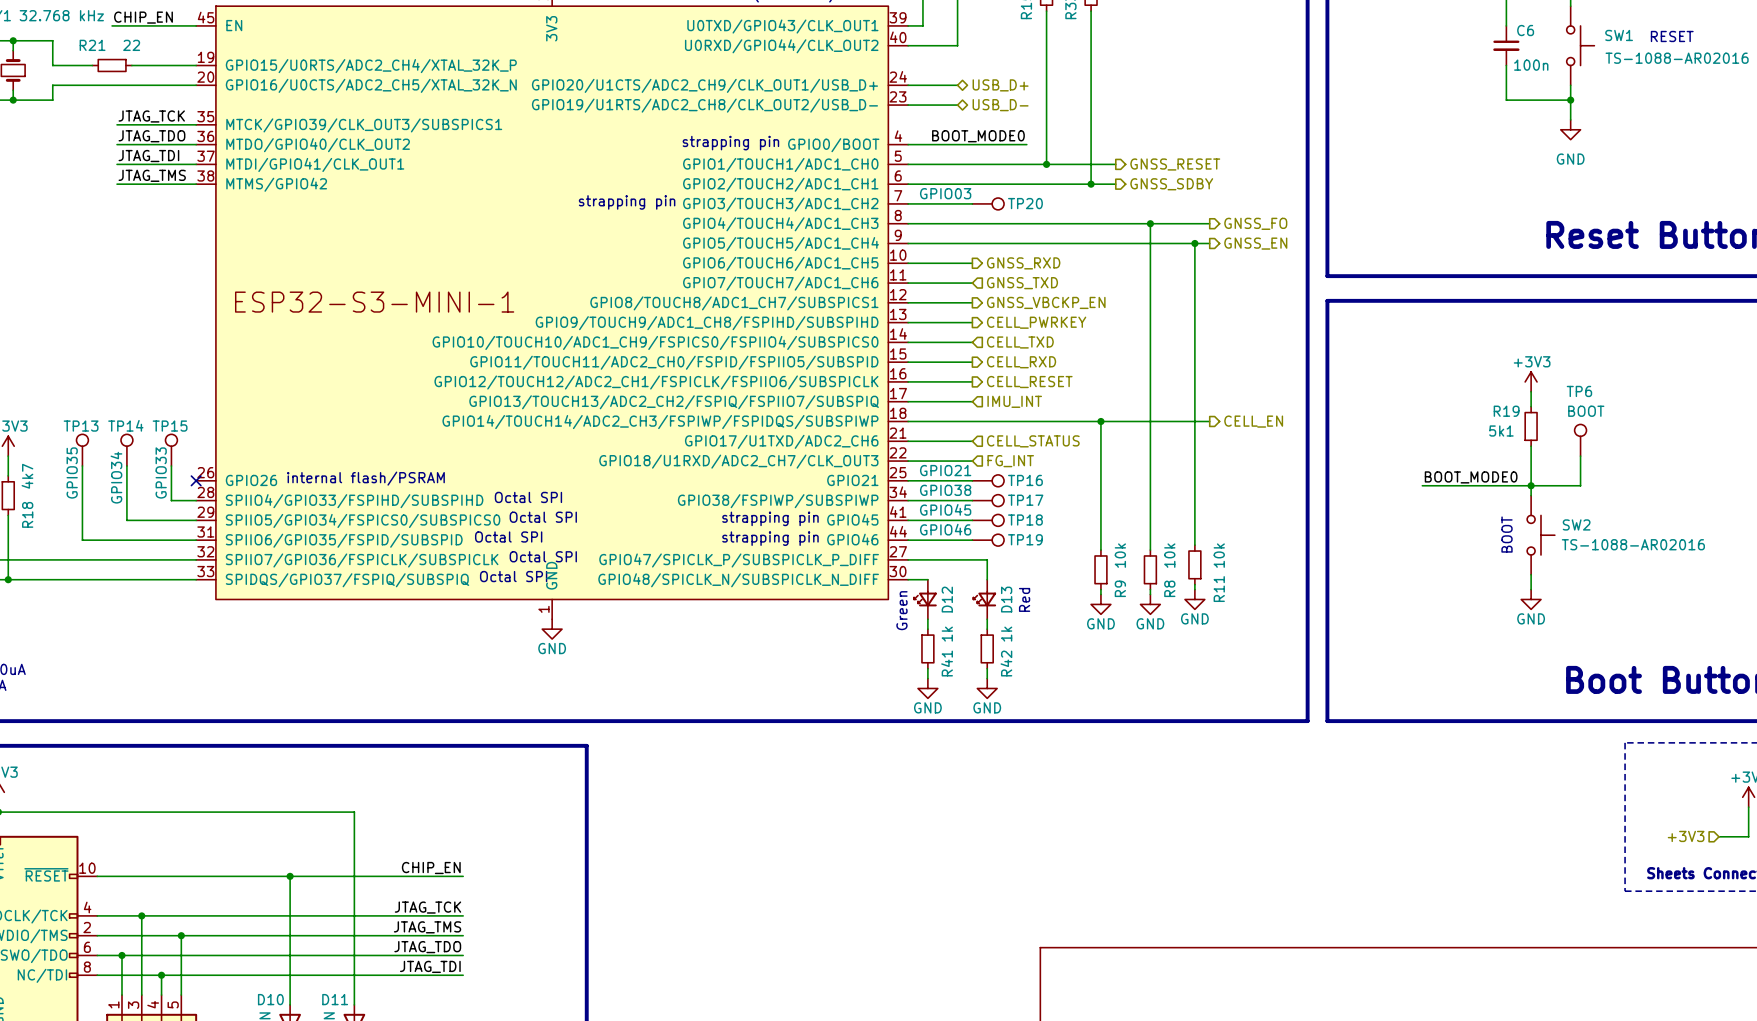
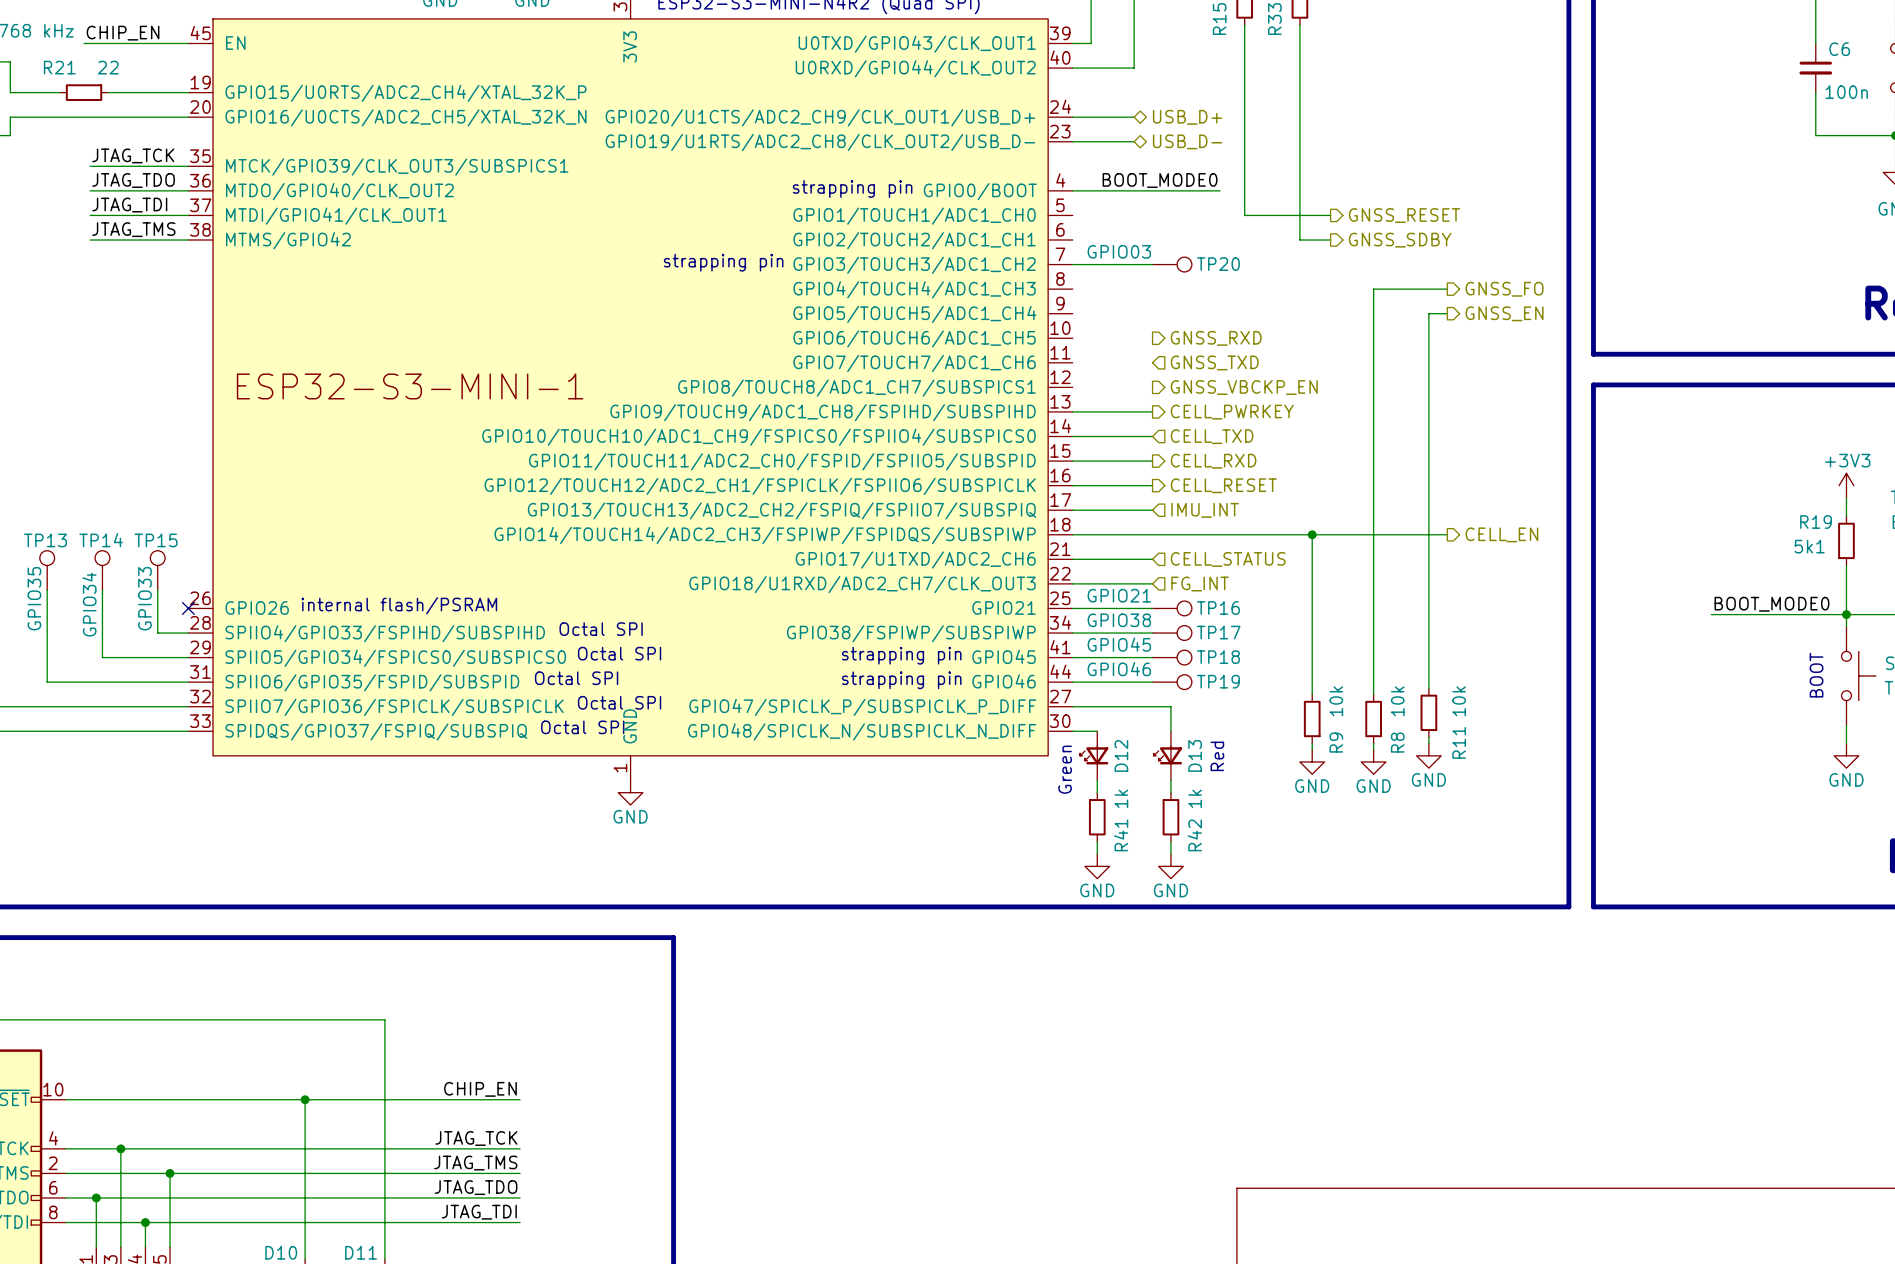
wire: (908, 164) (1046, 164) -> none
junction: (1046, 164) -> none
wire: (908, 184) (1091, 184) -> none
junction: (1091, 184) -> none
wire: (908, 223) (1150, 223) -> none
junction: (1150, 223) -> none
wire: (908, 243) (1194, 243) -> none
junction: (1194, 243) -> none
wire: (908, 263) (972, 263) -> none
wire: (908, 283) (972, 283) -> none
wire: (908, 302) (972, 302) -> none

